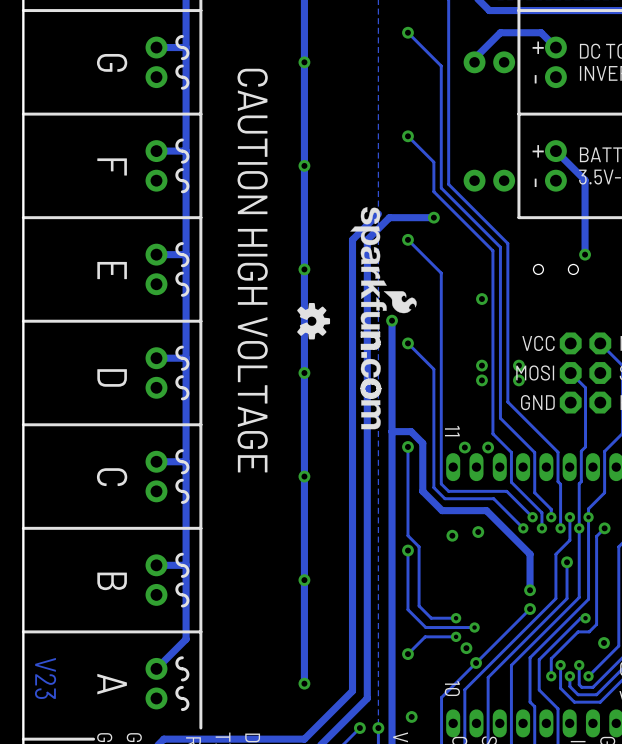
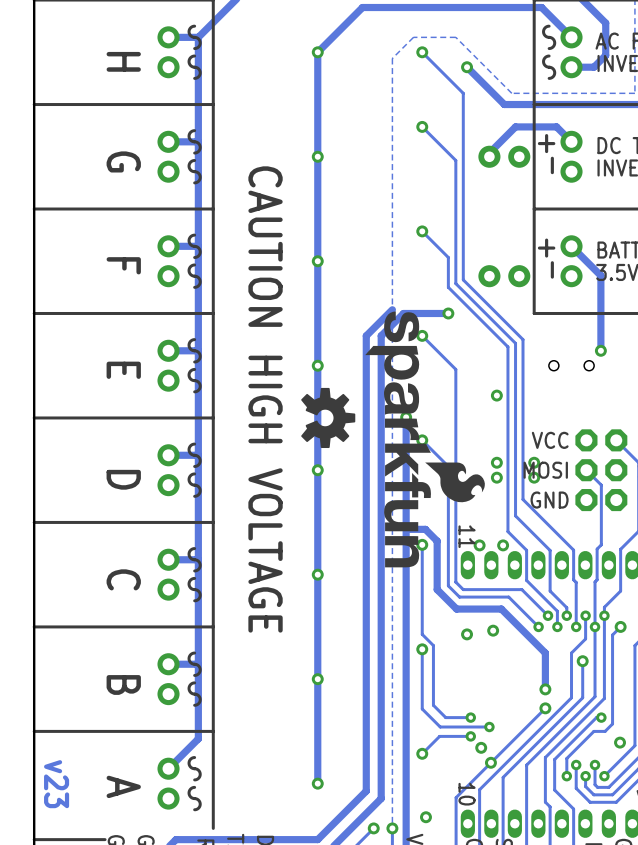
drawing: [350, 207, 417, 430] -> none
drawing: none -> [365, 311, 485, 568]
drawing shape: [297, 303, 331, 340] -> [301, 387, 356, 449]
text: V23 (45, 678) -> v23 (56, 784)

